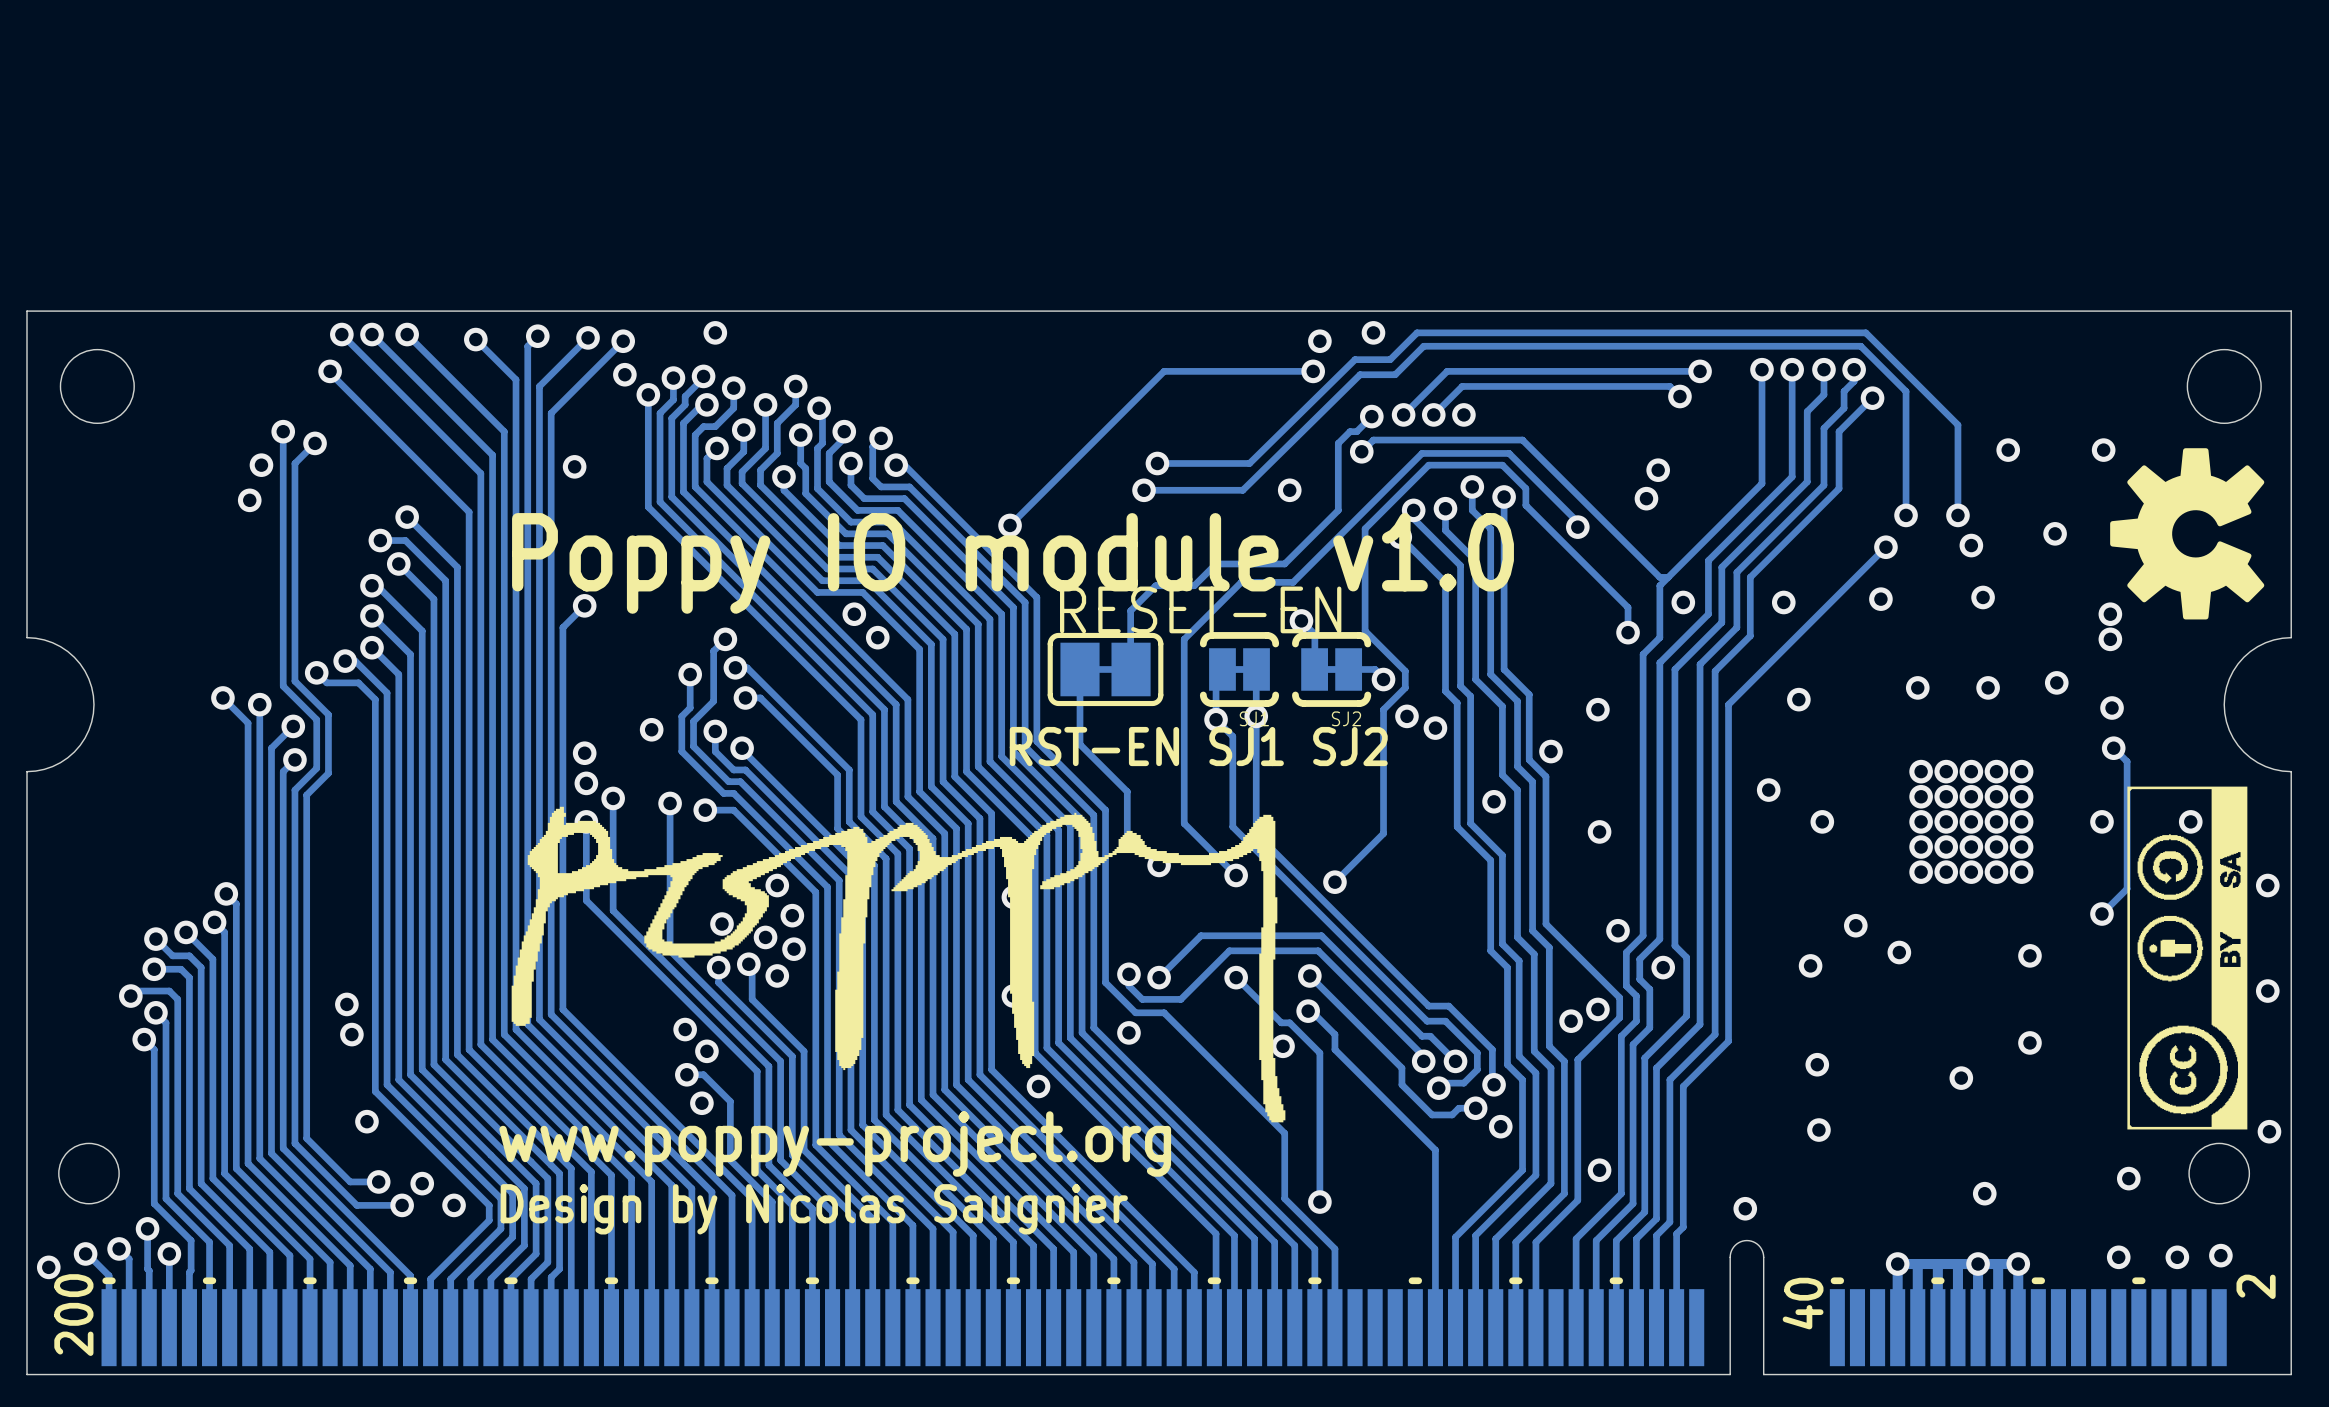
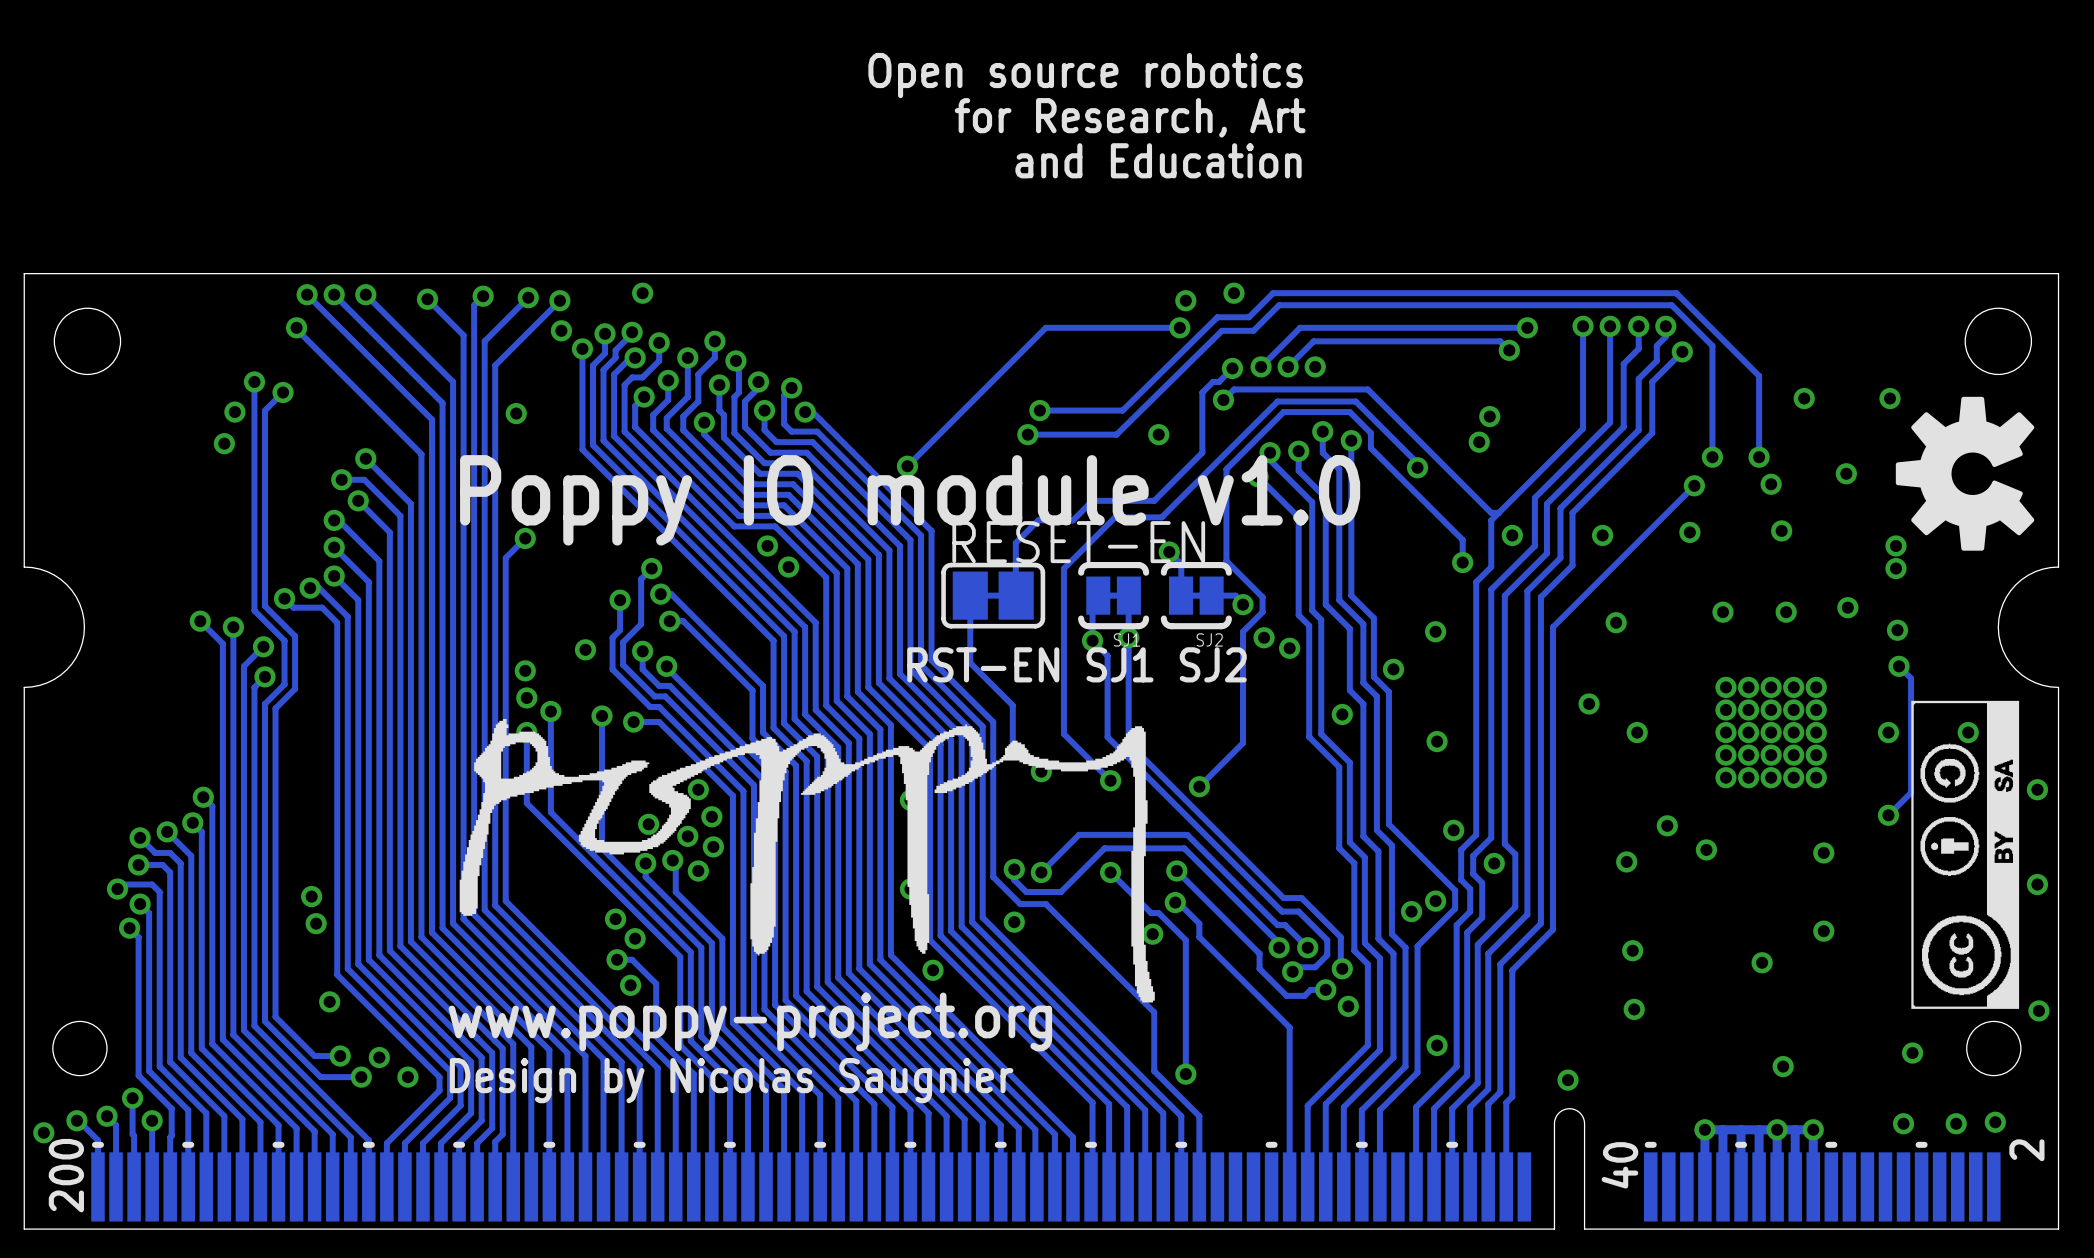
text: none -> Open source robotics (1085, 75)
text: none -> for Research, Art (1130, 117)
text: none -> and Education (1158, 160)

